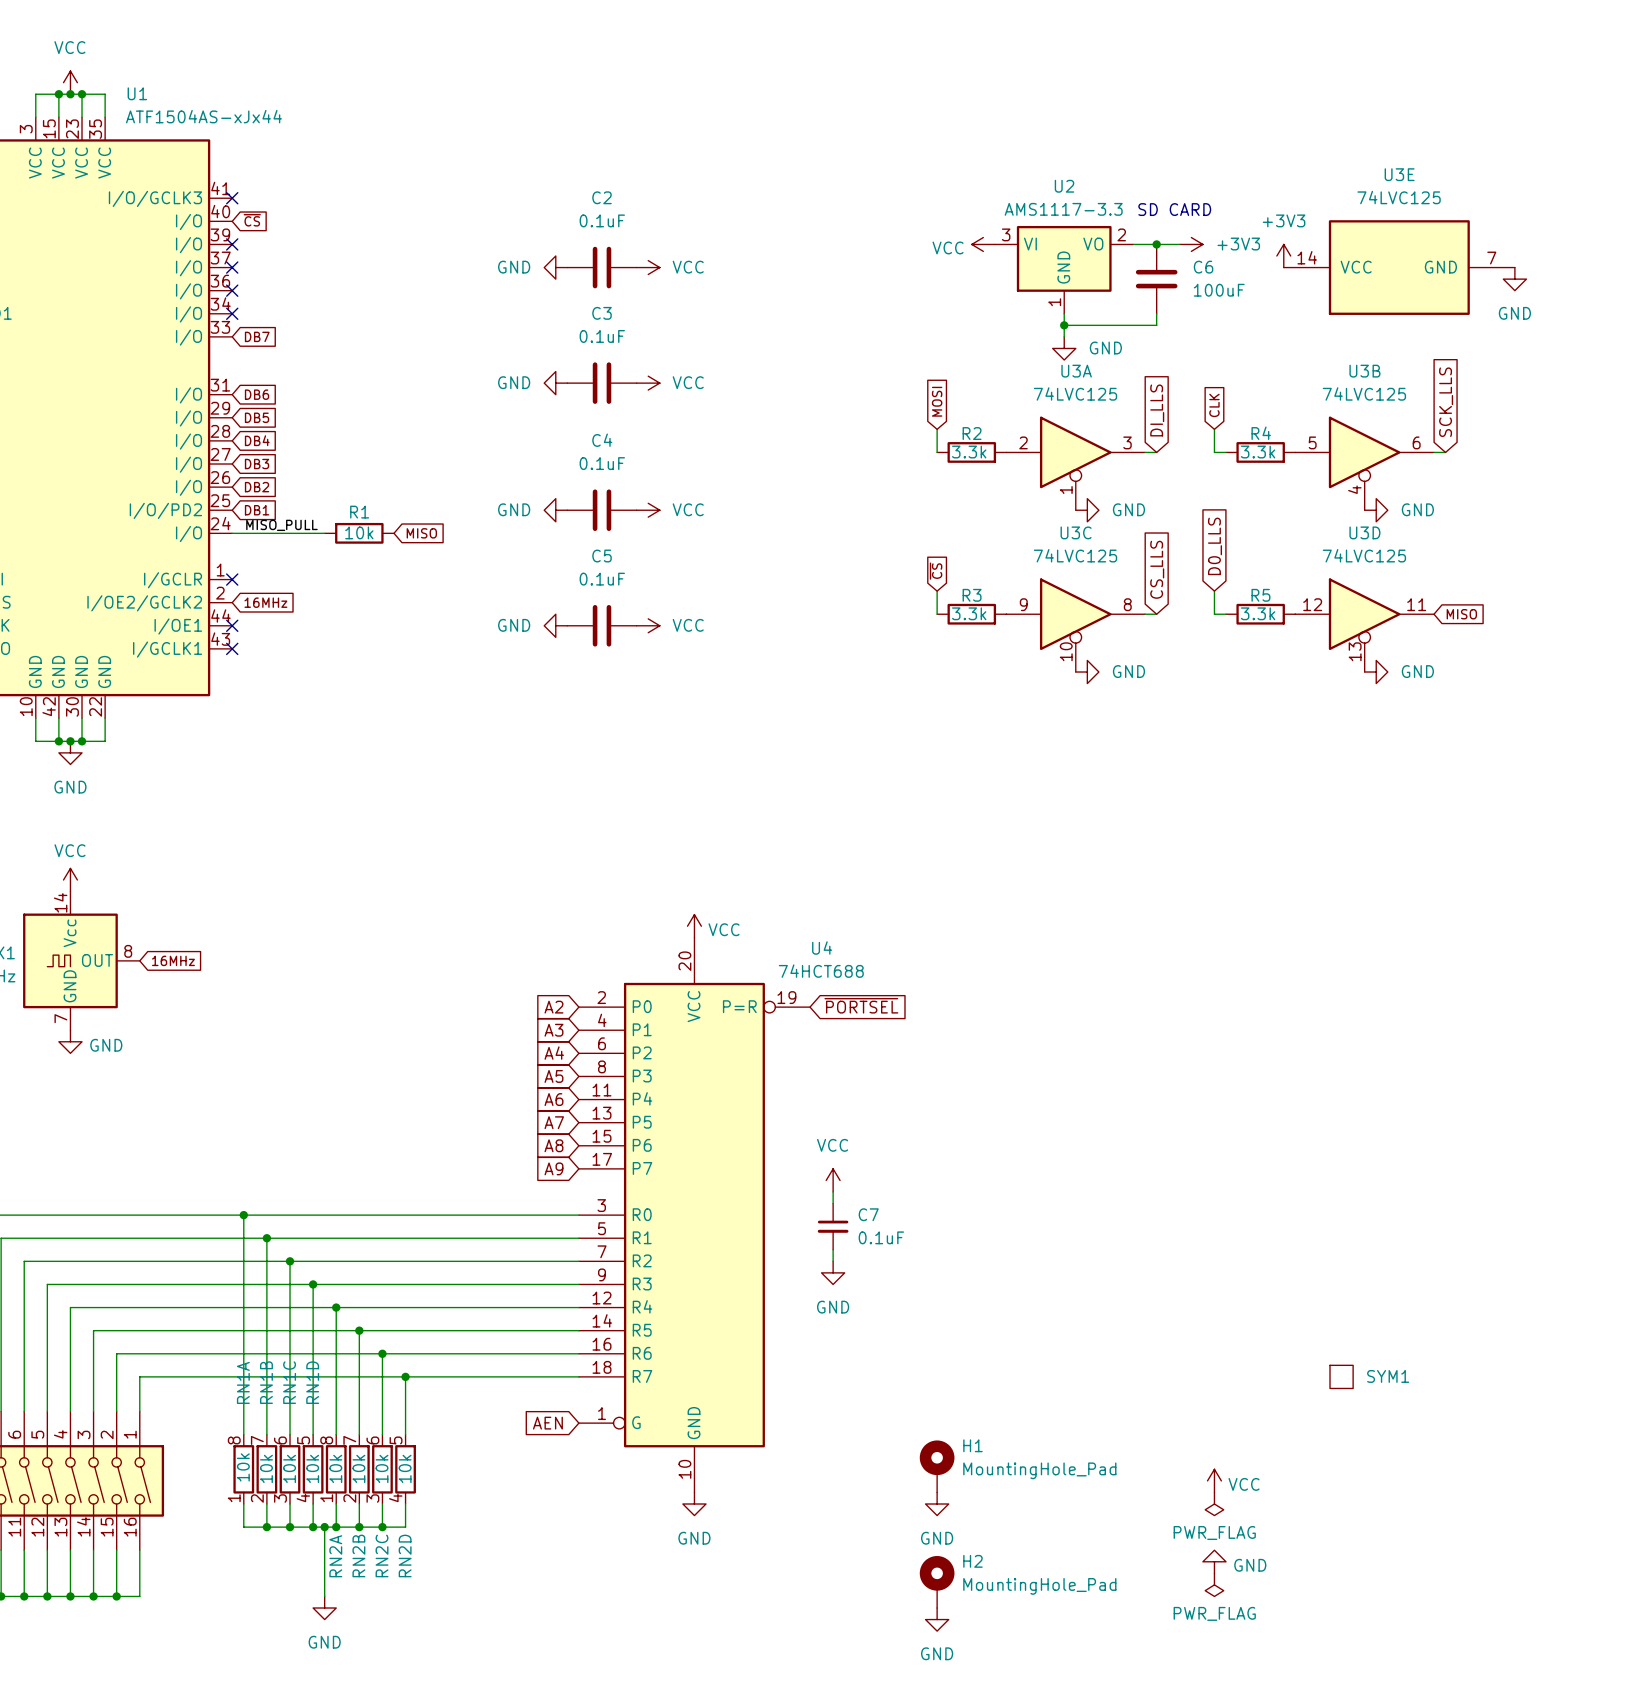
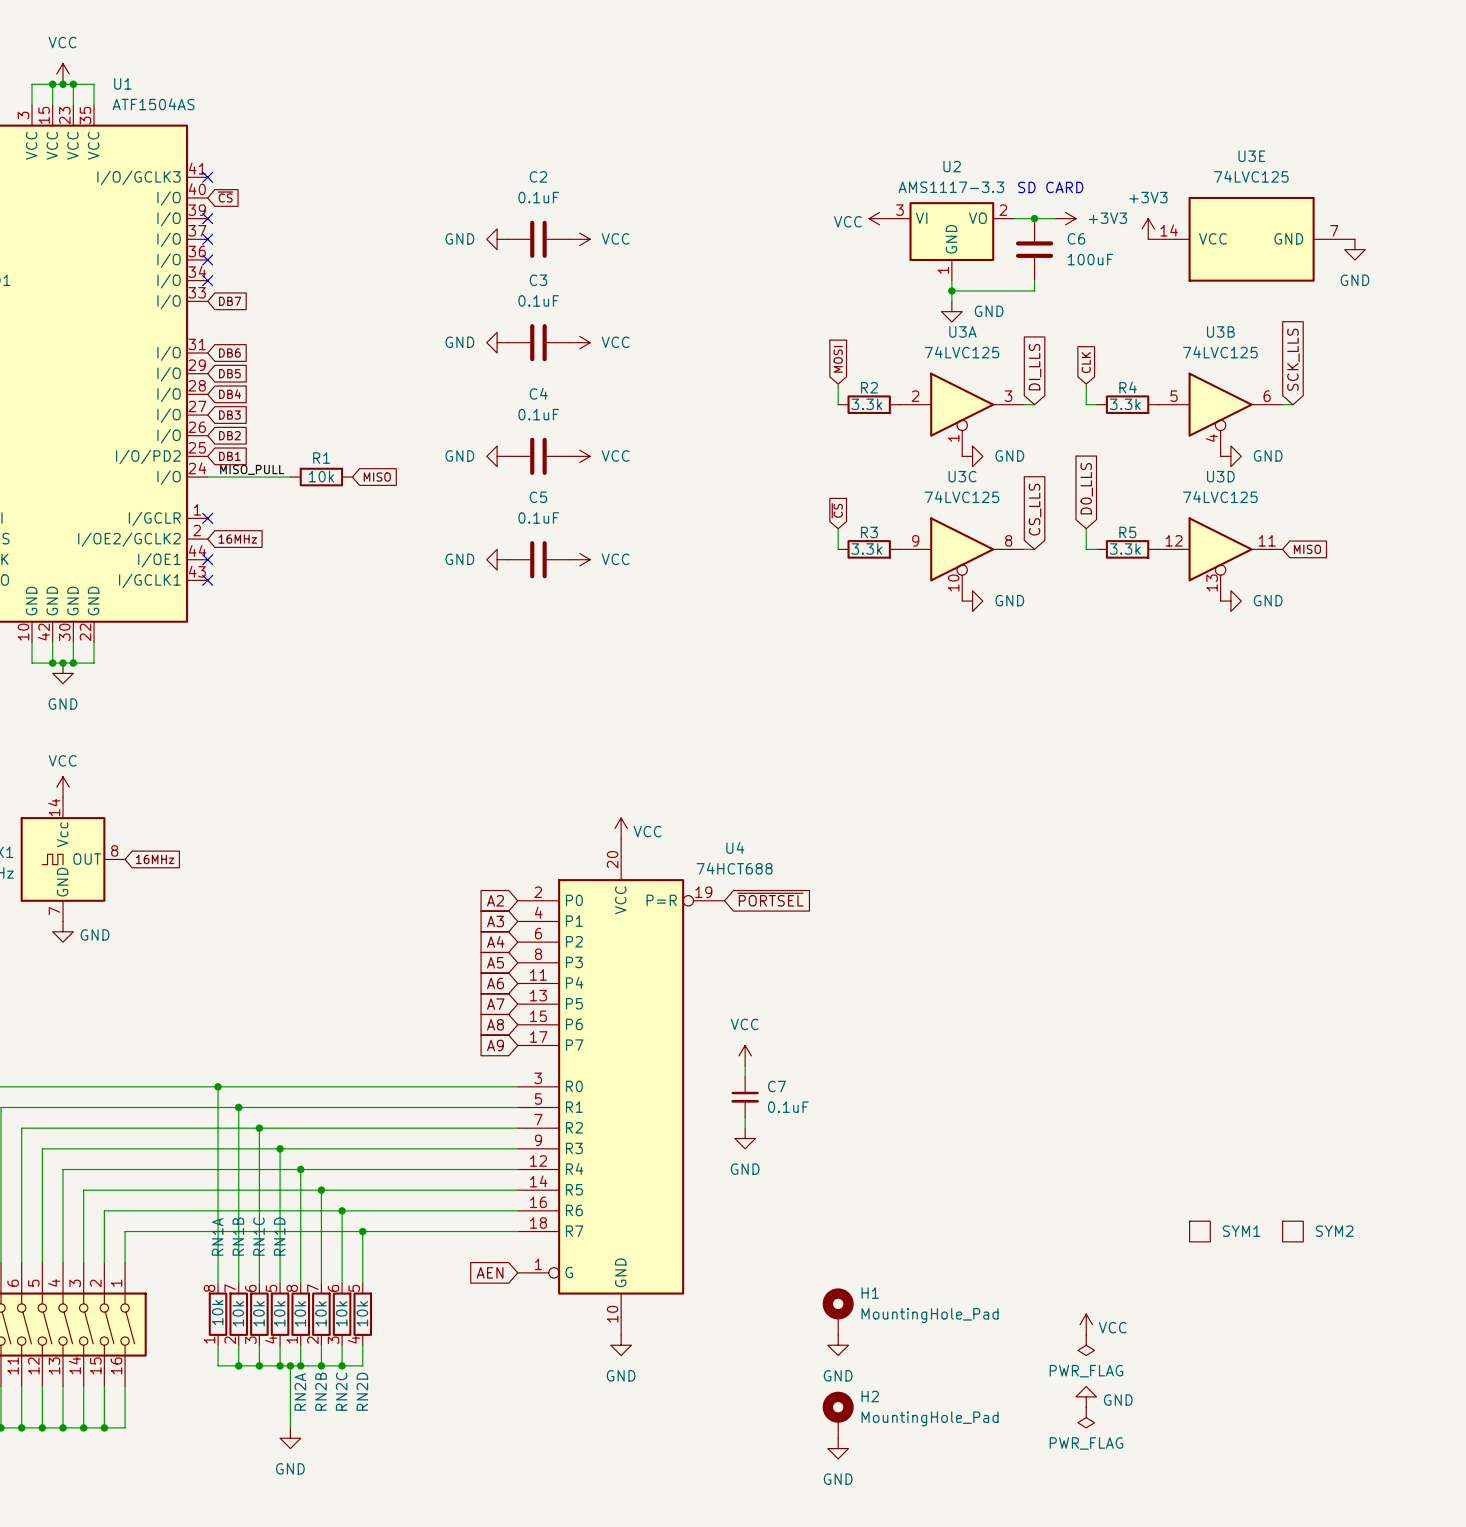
U1 value: ATF1504AS-xJx44 (203, 116) -> ATF1504AS (153, 104)
SYM2: none -> (1292, 1231)

